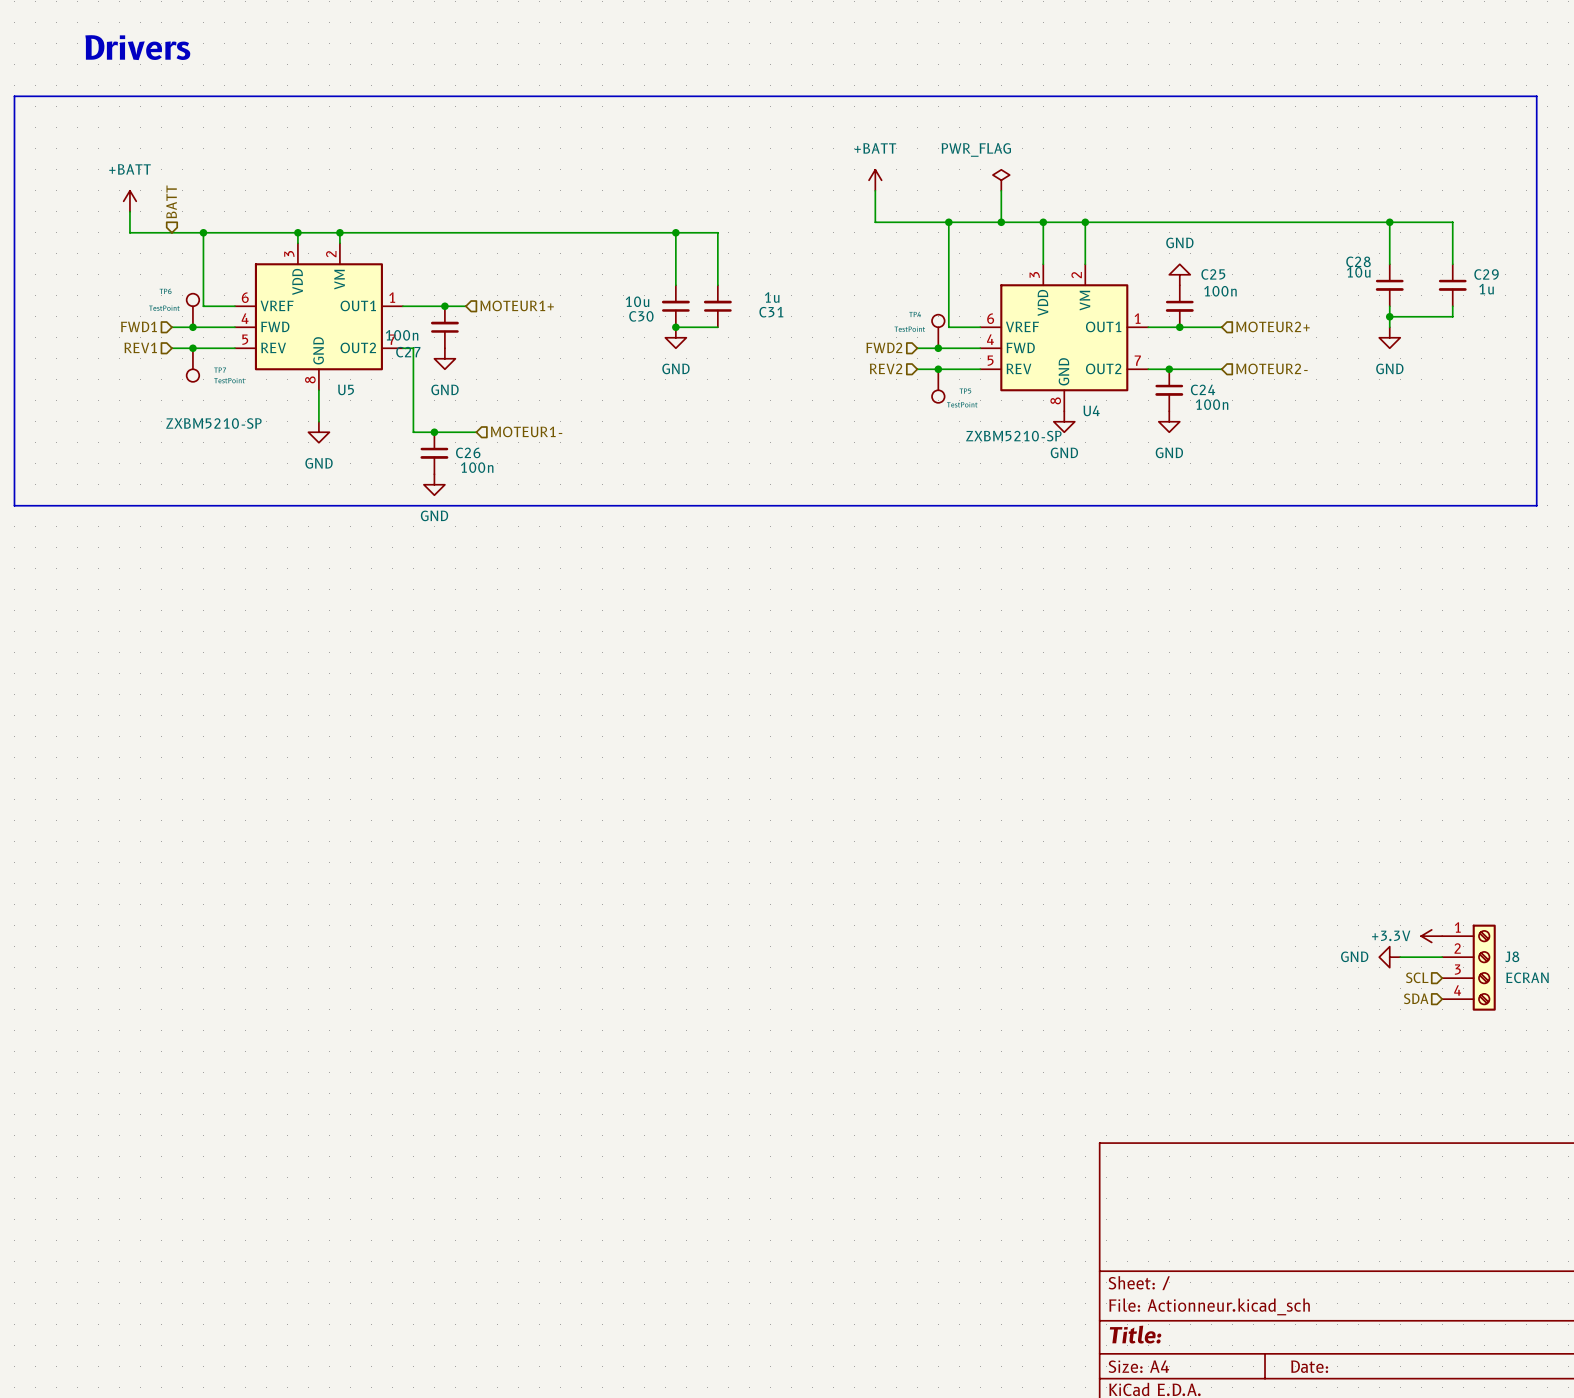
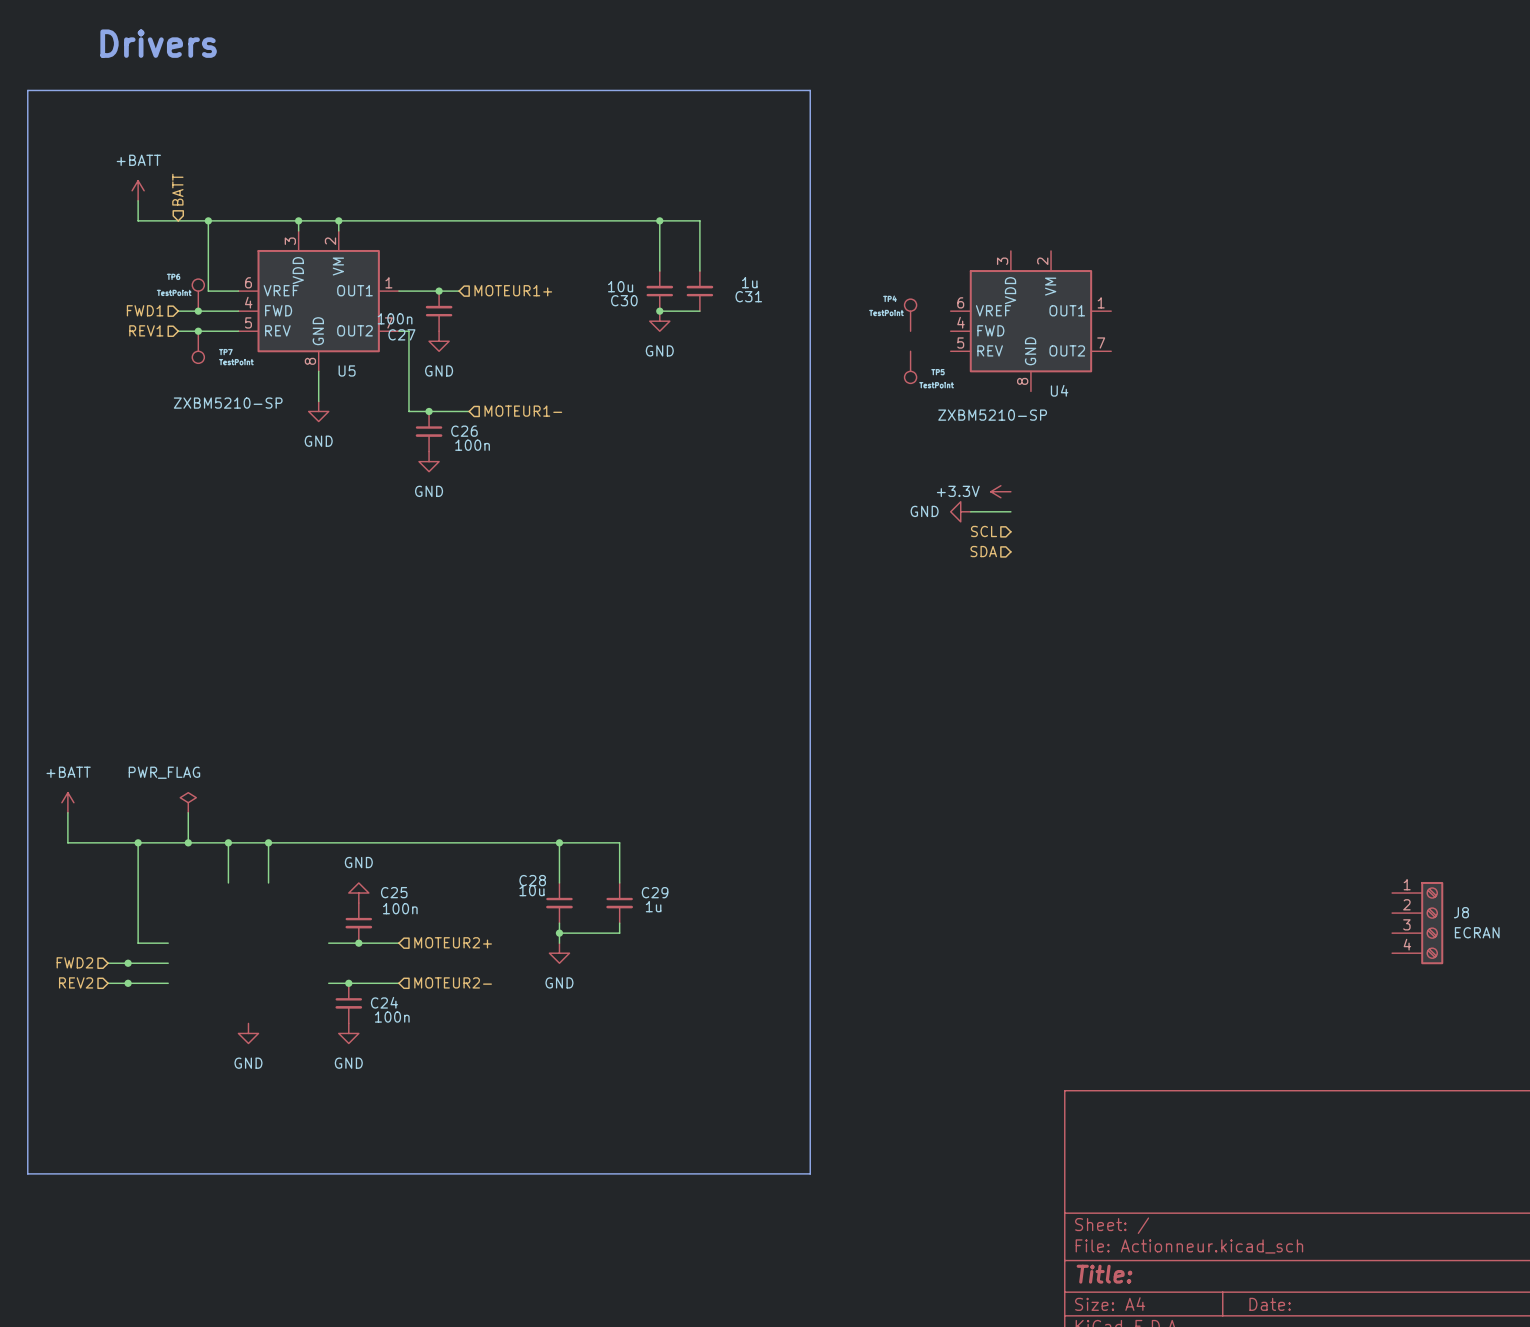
line: (833, 96) (1536, 96) (1536, 505) (14, 505) -> (810, 90) (810, 1173) (27, 1173) (27, 481)
power symbol: +BATT (875, 180) -> none
power symbol: PWR_FLAG (1001, 180) -> none
wire: (875, 190) (875, 222) (1452, 222) (1452, 264) -> none
wire: (1001, 190) (1001, 222) -> none
wire: (948, 222) (948, 327) (980, 327) -> none
junction: (948, 222) -> none
junction: (1001, 222) -> none
wire: (1043, 222) (1043, 264) -> none
junction: (1043, 222) -> none
wire: (1085, 222) (1085, 264) -> none
junction: (1085, 222) -> none
wire: (1389, 222) (1389, 264) -> none
junction: (1389, 222) -> none
power symbol: GND (1179, 274) -> none
C28 position: (1389, 285) -> (559, 903)
C29 position: (1452, 285) -> (619, 903)
C25 position: (1179, 306) -> (358, 923)
wire: (1389, 306) (1389, 327) -> none
wire: (1452, 306) (1452, 316) (1389, 316) -> none
junction: (1389, 316) -> none
hierarchical label: MOTEUR2+ (1272, 326) -> none
wire: (1148, 327) (1221, 327) -> none
junction: (1179, 327) -> none
power symbol: GND (1389, 337) -> none
hierarchical label: FWD2 (884, 347) -> none
wire: (917, 348) (980, 348) -> none
junction: (938, 348) -> none
hierarchical label: REV2 (886, 368) -> none
hierarchical label: MOTEUR2- (1271, 368) -> none
wire: (917, 369) (980, 369) -> none
junction: (938, 369) -> none
wire: (1148, 369) (1221, 369) -> none
junction: (1169, 369) -> none
C24 position: (1169, 390) -> (348, 1003)
power symbol: GND (1064, 421) -> none
power symbol: GND (1169, 421) -> none
power symbol: none -> +3.3V (1000, 491)
power symbol: none -> GND (960, 511)
wire: none -> (970, 511) (1010, 511)
hierarchical label: none -> SCL (983, 531)
hierarchical label: none -> SDA (983, 551)
power symbol: none -> +BATT (67, 802)
power symbol: none -> PWR_FLAG (188, 802)
wire: none -> (67, 812) (67, 842) (619, 842) (619, 882)
wire: none -> (188, 812) (188, 842)
wire: none -> (138, 842) (138, 943) (168, 943)
junction: none -> (138, 842)
junction: none -> (188, 842)
wire: none -> (228, 842) (228, 882)
junction: none -> (228, 842)
wire: none -> (268, 842) (268, 882)
junction: none -> (268, 842)
wire: none -> (559, 842) (559, 882)
junction: none -> (559, 842)
power symbol: none -> GND (358, 893)
power symbol: +3.3V (1431, 936) -> none
power symbol: GND (1389, 957) -> none
wire: (1400, 957) (1442, 957) -> none
wire: none -> (559, 923) (559, 943)
wire: none -> (619, 923) (619, 933) (559, 933)
hierarchical label: SCL (1417, 977) -> none
junction: none -> (559, 933)
wire: none -> (328, 943) (398, 943)
junction: none -> (358, 943)
hierarchical label: none -> MOTEUR2+ (453, 942)
hierarchical label: SDA (1416, 998) -> none
power symbol: none -> GND (559, 953)
hierarchical label: none -> FWD2 (74, 962)
wire: none -> (108, 963) (168, 963)
junction: none -> (128, 963)
hierarchical label: none -> REV2 (76, 982)
wire: none -> (108, 983) (168, 983)
junction: none -> (128, 983)
wire: none -> (328, 983) (398, 983)
junction: none -> (348, 983)
hierarchical label: none -> MOTEUR2- (453, 982)
power symbol: none -> GND (248, 1033)
power symbol: none -> GND (348, 1033)

